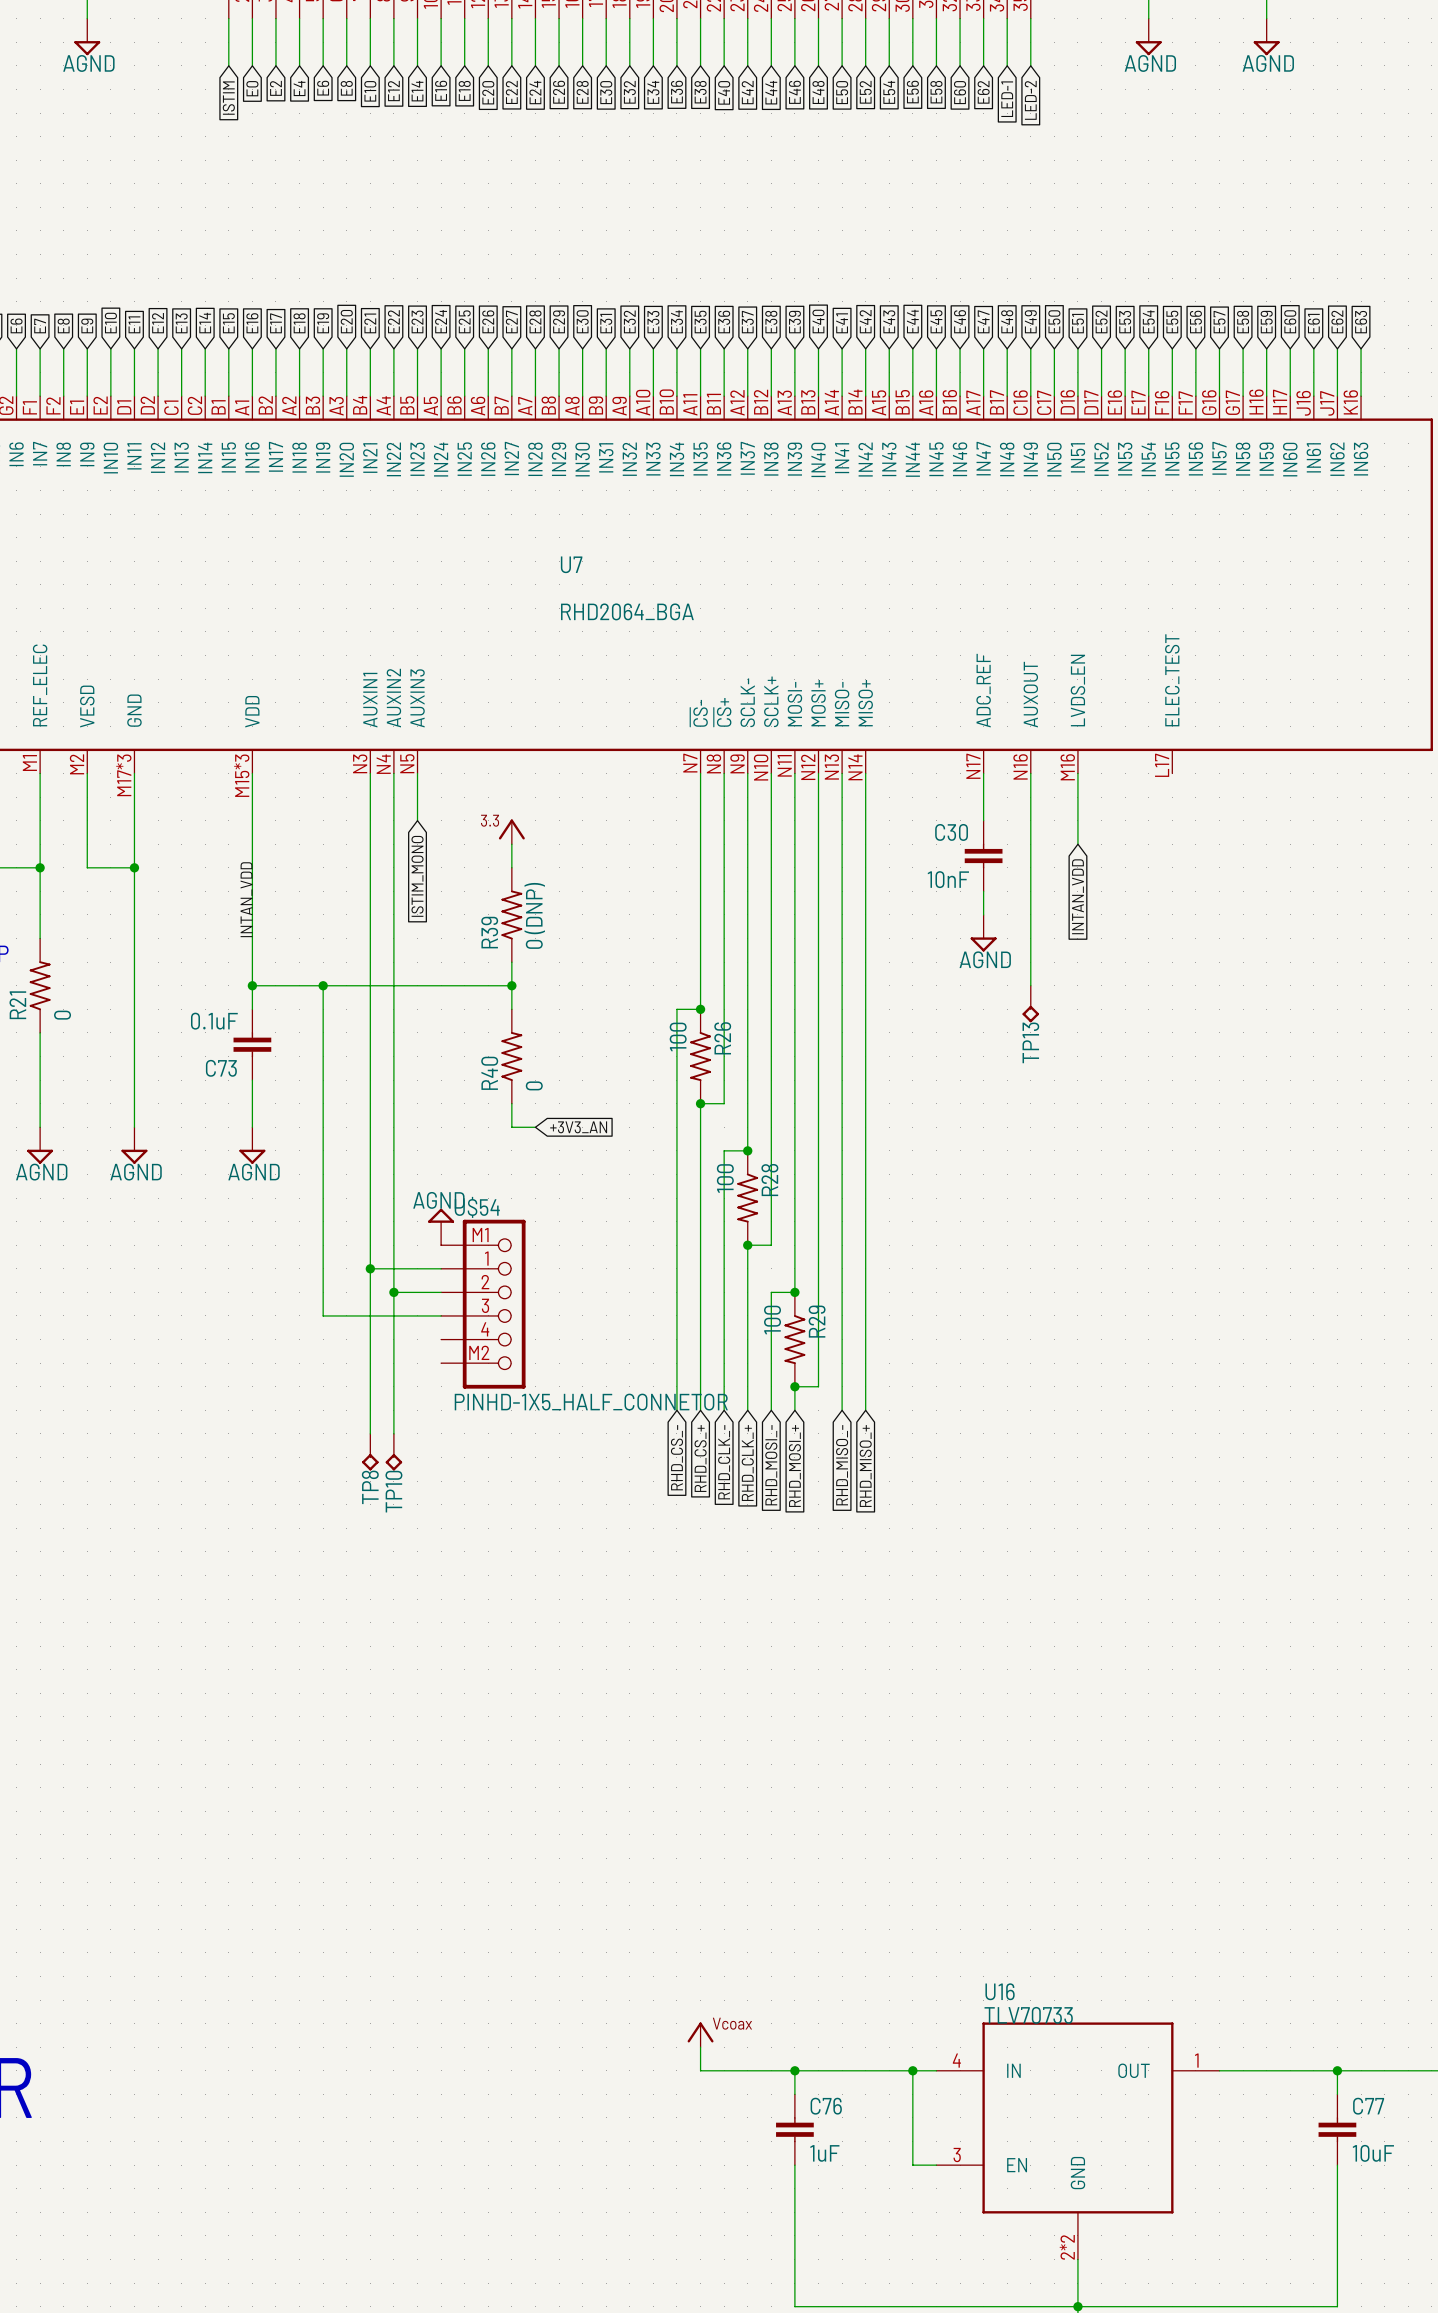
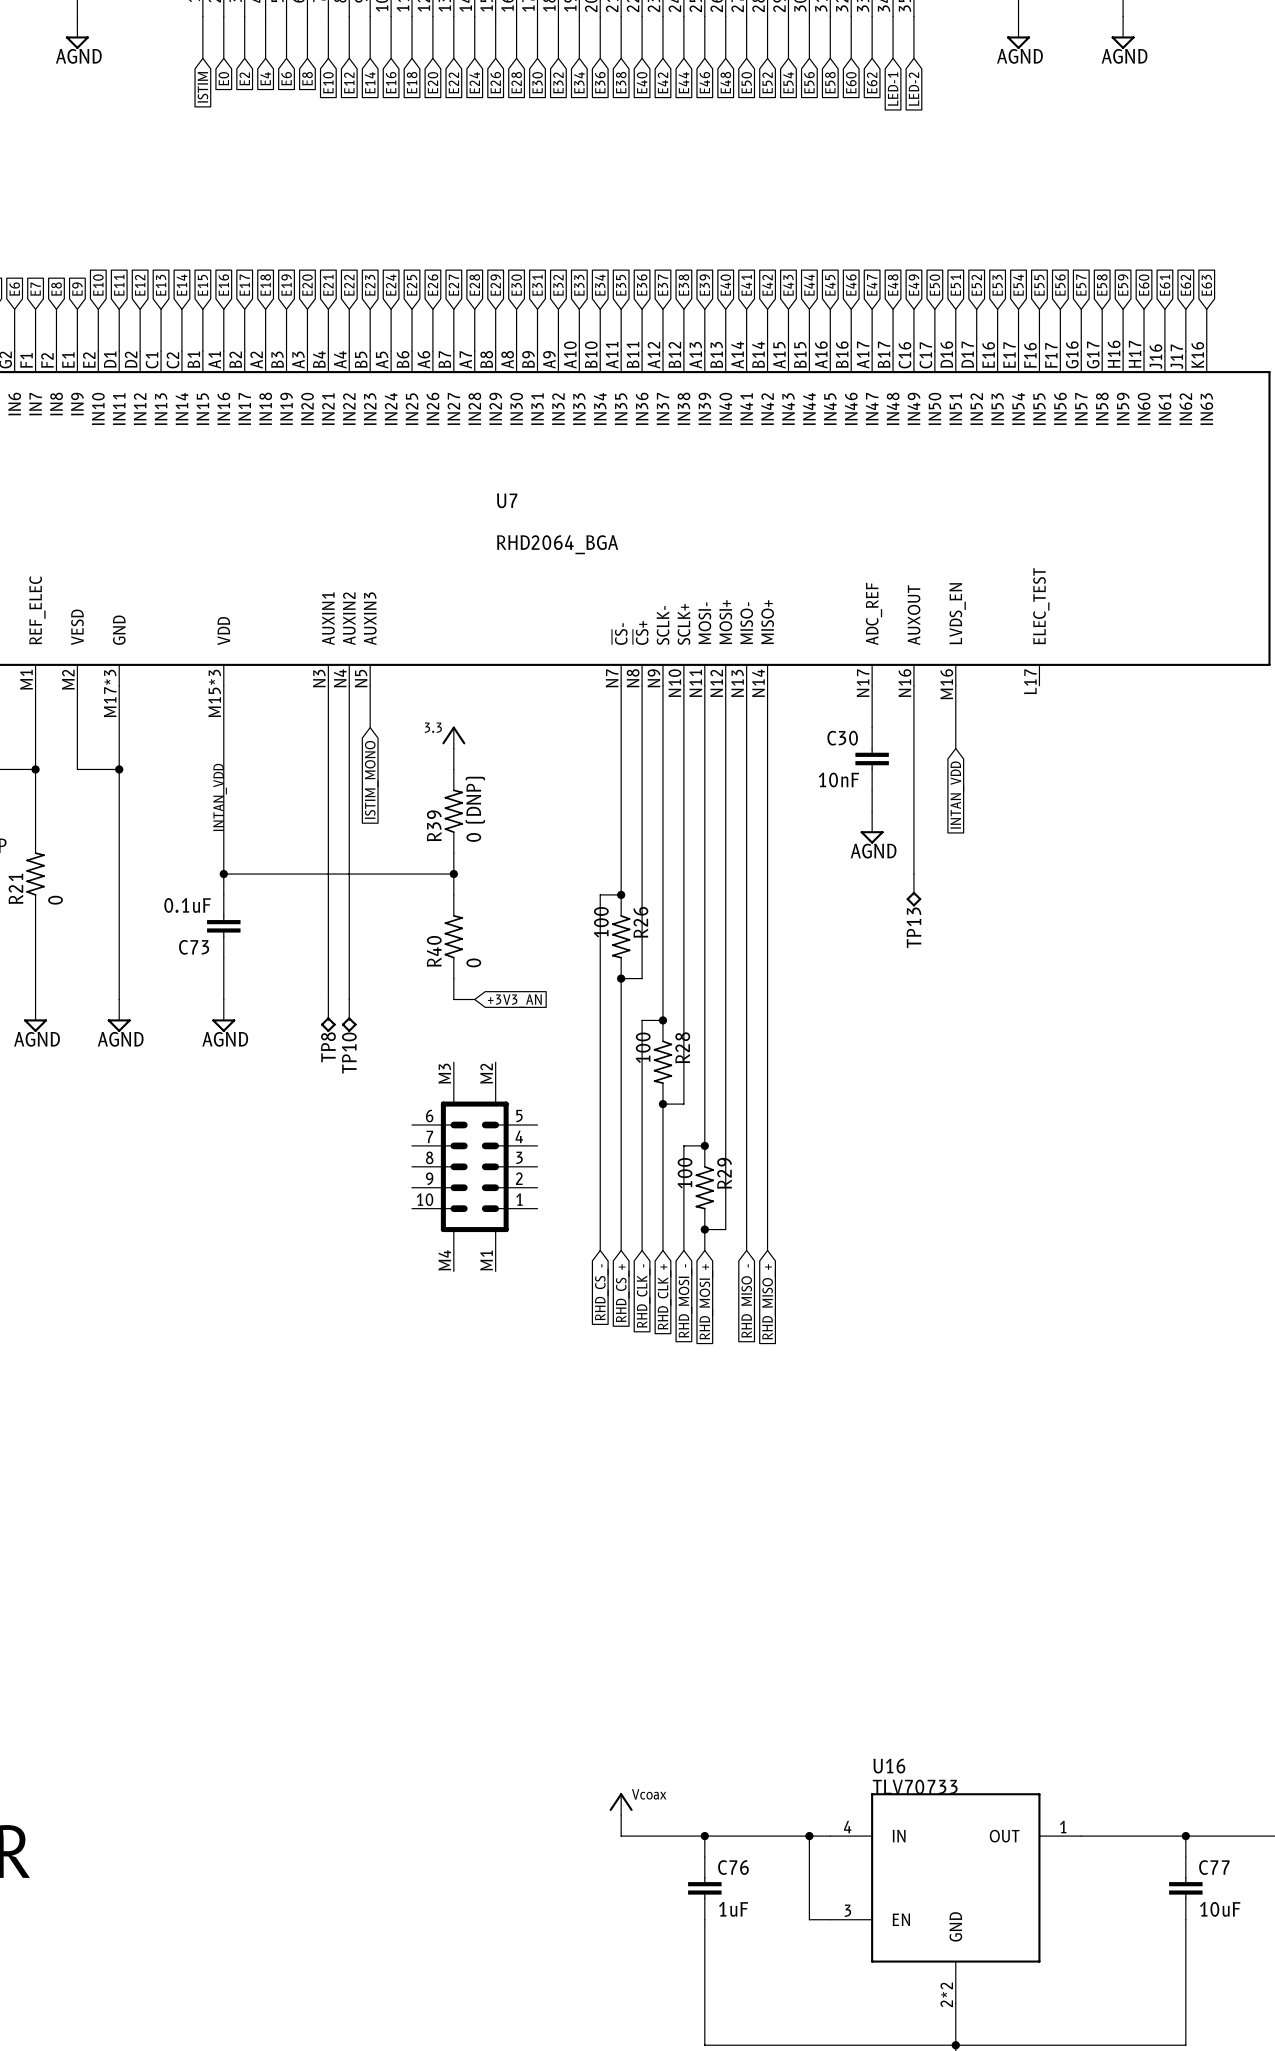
wire: (323, 985) (323, 1315) (441, 1315) -> none
junction: (323, 985) -> none
wire: (370, 1127) (370, 1433) -> none
wire: (393, 1127) (393, 1433) -> none
power symbol: AGND (441, 1226) -> none
wire: (370, 1268) (441, 1268) -> none
junction: (370, 1268) -> none
wire: (393, 1292) (441, 1292) -> none
junction: (393, 1292) -> none
U$54: PINHD-1X5_HALF_CONNETOR (483, 1304) -> none
part: none -> (474, 1166)
TP8 position: (370, 1452) -> (328, 1015)
TP10 position: (393, 1452) -> (349, 1015)

